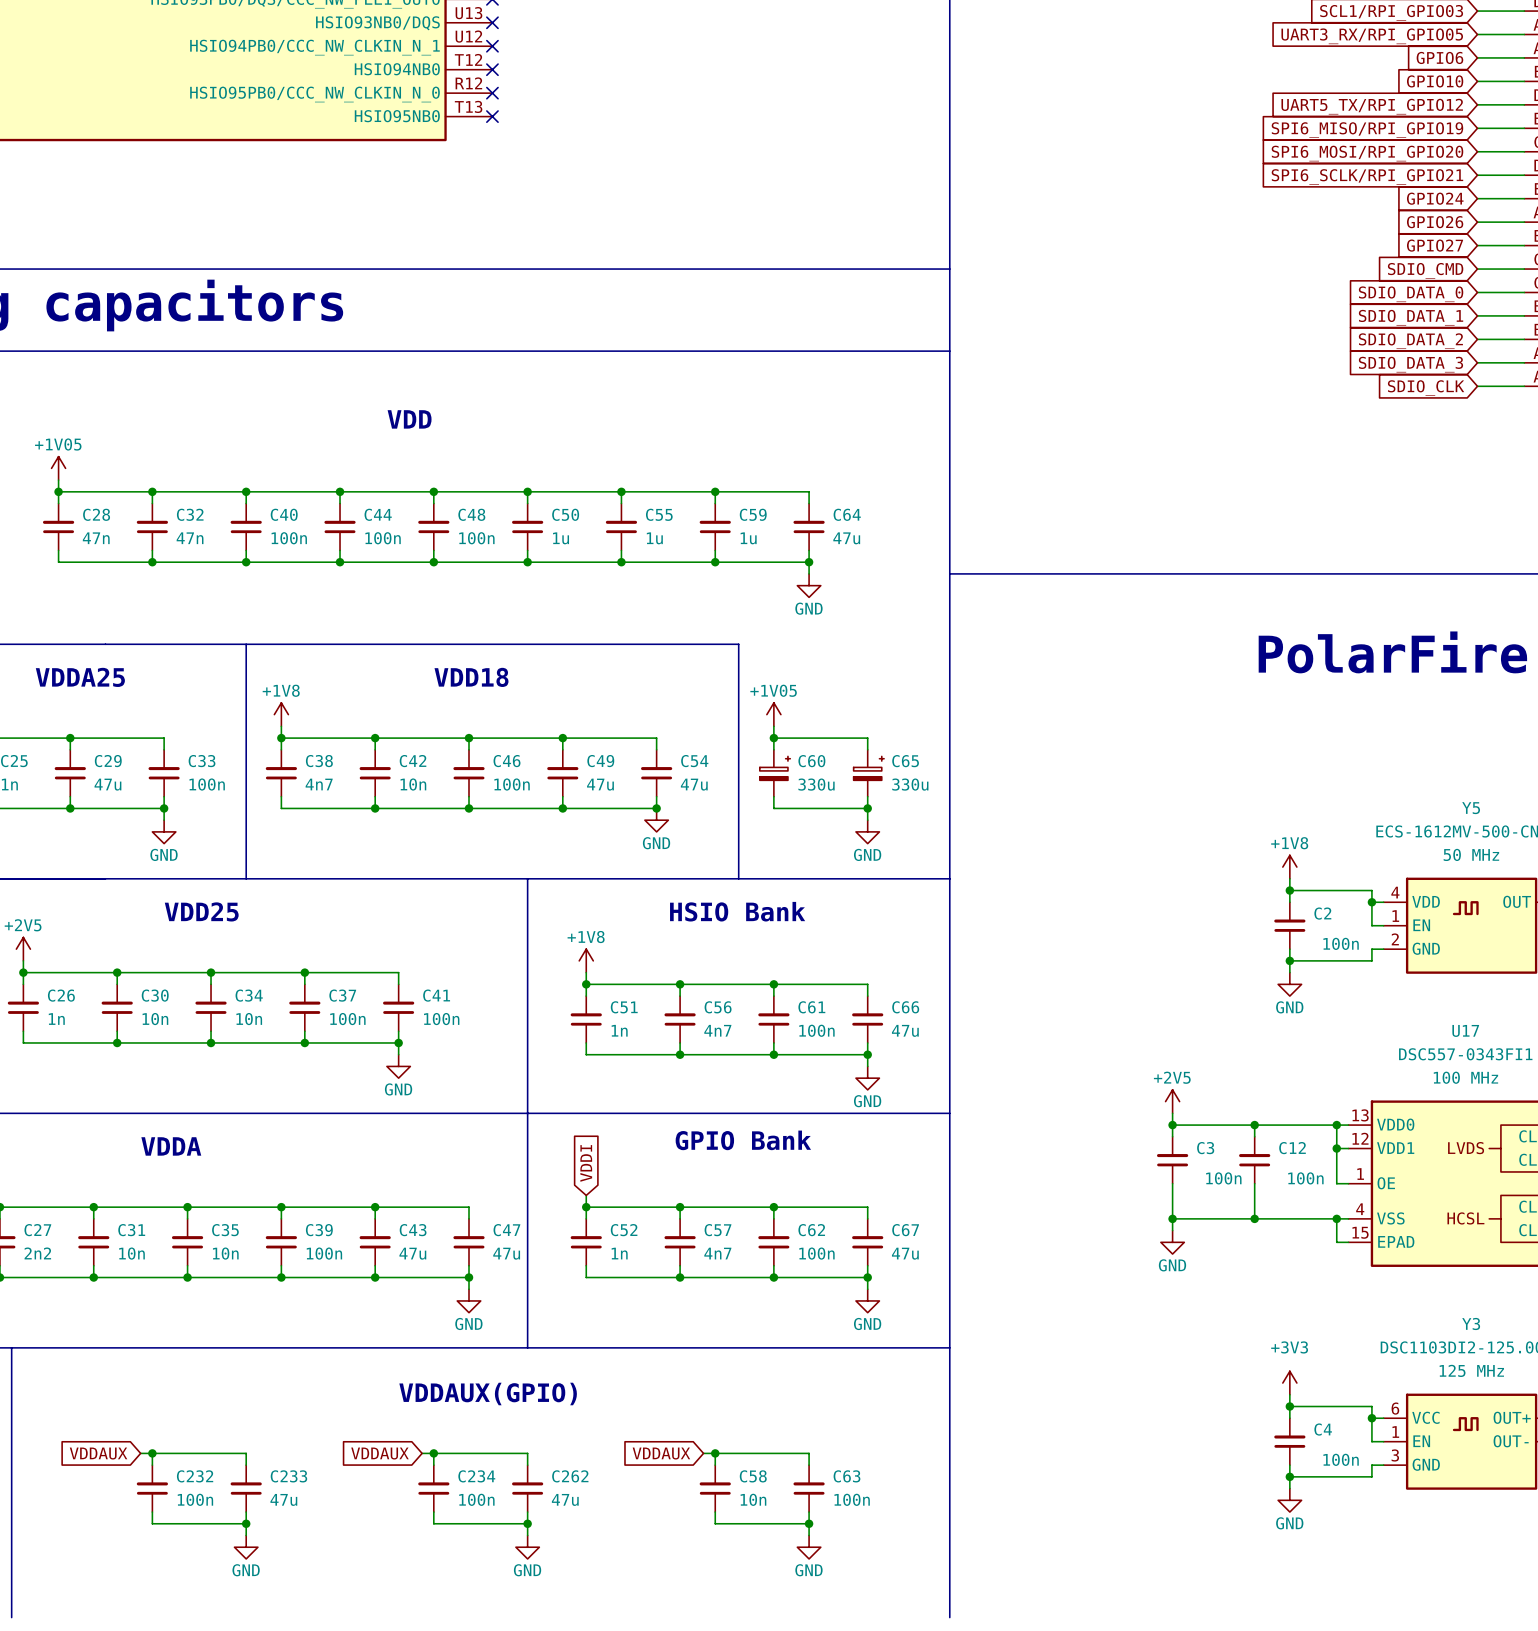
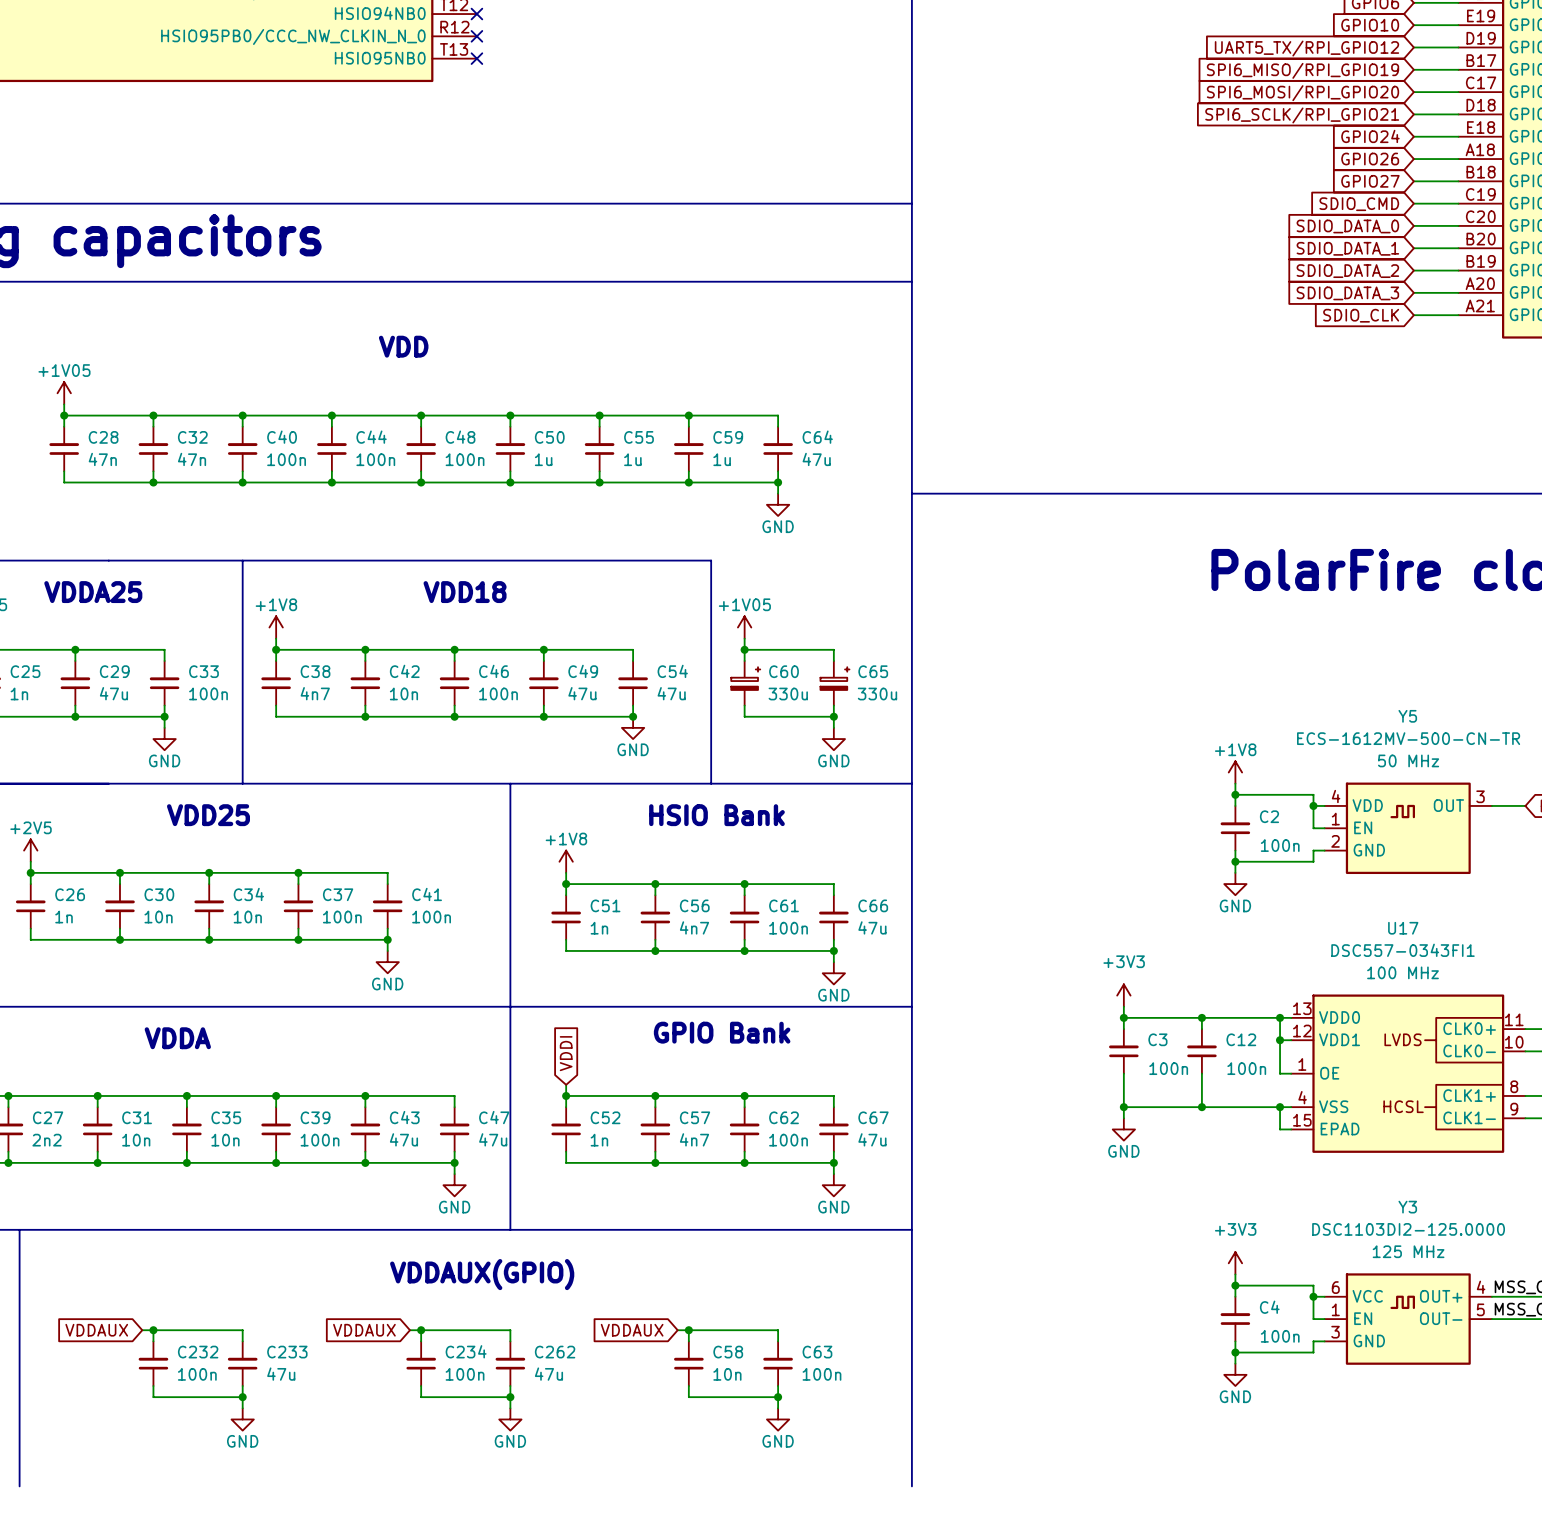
power symbol: +2V5 (1172, 1101) -> +3V3 (1123, 995)

